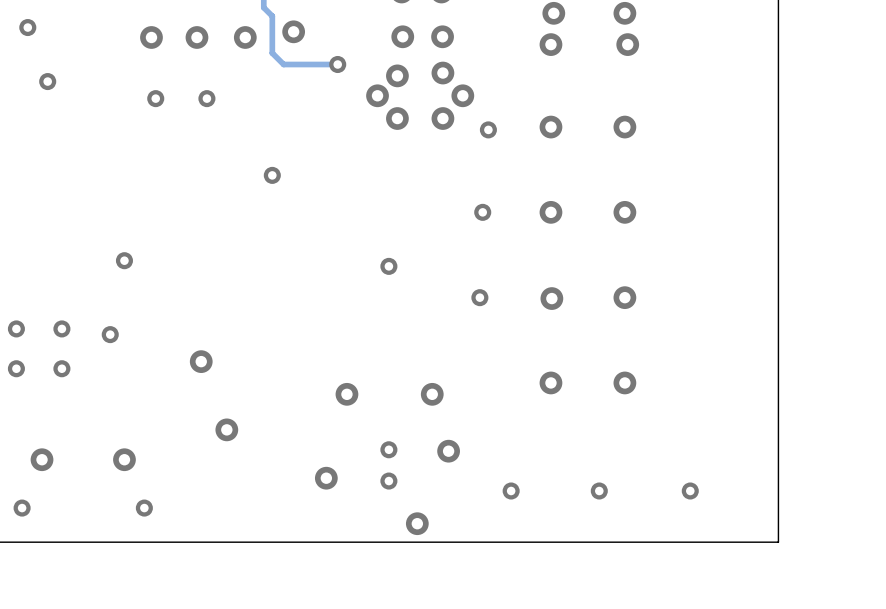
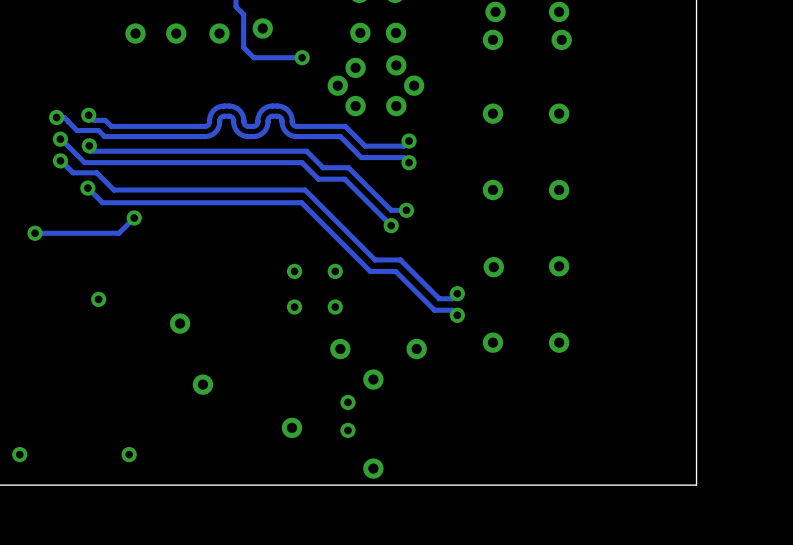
via: (27, 27) -> none
via: (47, 81) -> none
via: (155, 98) -> none
via: (206, 98) -> none
track: none -> (88, 115) (93, 120) (105, 120) (111, 126) (204, 126) (208, 124) (210, 114) (215, 109) (220, 106) (230, 106) (240, 111) (245, 125) (253, 126) (257, 124) (259, 114) (263, 109) (269, 106) (279, 106) (288, 111) (295, 126) (345, 126) (365, 146) (403, 146) (409, 141)
via: none -> (88, 115)
via: (488, 129) -> none
track: none -> (56, 117) (64, 117) (77, 130) (98, 130) (104, 136) (204, 136) (216, 131) (221, 117) (229, 116) (233, 118) (235, 128) (239, 133) (253, 136) (264, 131) (269, 117) (278, 116) (281, 119) (285, 131) (291, 135) (340, 136) (361, 157) (403, 157) (409, 162)
via: none -> (56, 117)
track: none -> (60, 139) (84, 162) (301, 162) (318, 179) (344, 179) (391, 225)
via: none -> (60, 139)
via: none -> (409, 141)
track: none -> (89, 145) (90, 151) (306, 151) (323, 167) (348, 167) (391, 210) (406, 210)
via: none -> (89, 145)
via: (272, 175) -> none
track: none -> (60, 160) (73, 172) (96, 172) (113, 190) (305, 190) (375, 259) (400, 259) (439, 298) (452, 298) (457, 293)
via: none -> (60, 160)
via: none -> (409, 162)
track: none -> (87, 188) (102, 202) (301, 202) (370, 271) (395, 271) (434, 310) (452, 310) (457, 315)
via: none -> (87, 188)
via: (482, 212) -> none
via: none -> (406, 210)
track: none -> (134, 217) (119, 233) (35, 233)
via: none -> (134, 217)
via: none -> (391, 225)
via: none -> (35, 233)
via: (124, 260) -> none
via: (388, 266) -> none
via: (479, 297) -> none
via: none -> (294, 271)
via: none -> (335, 271)
via: (16, 328) -> none
via: (61, 328) -> none
via: none -> (457, 293)
via: none -> (294, 307)
via: none -> (335, 307)
via: none -> (457, 315)
via: (16, 368) -> none
via: (61, 368) -> none
via: none -> (340, 349)
via: none -> (416, 349)
via: (346, 394) -> none
via: (432, 394) -> none
via: none -> (373, 379)
via: (448, 451) -> none
via: (42, 459) -> none
via: (124, 459) -> none
via: (511, 491) -> none
via: (599, 491) -> none
via: (690, 491) -> none

